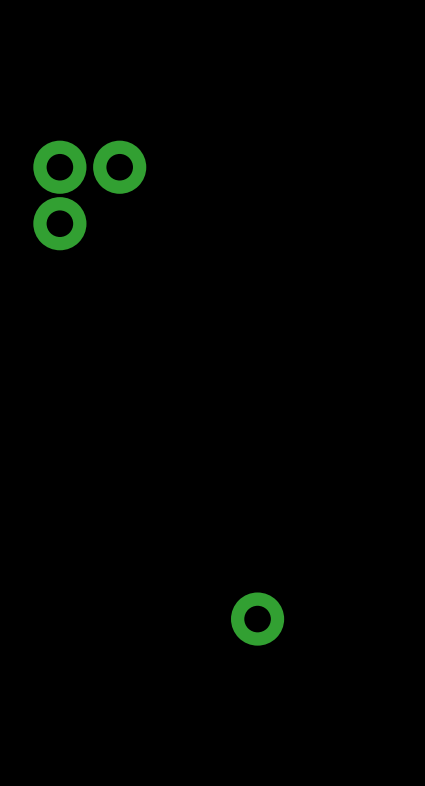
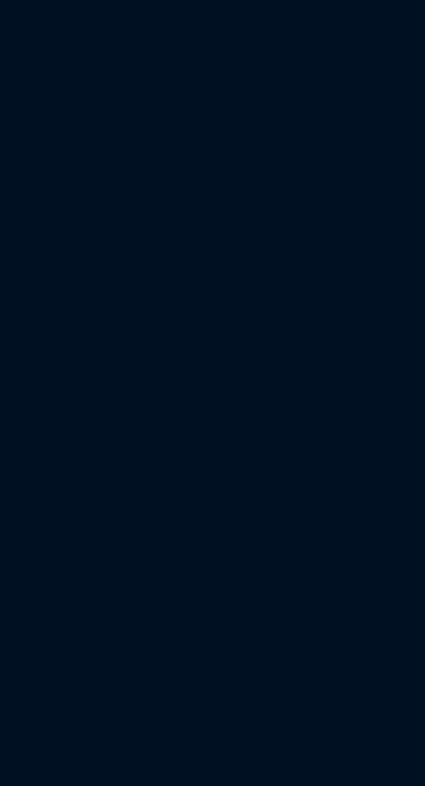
via: (59, 167) -> none
via: (119, 167) -> none
via: (59, 223) -> none
via: (257, 619) -> none

